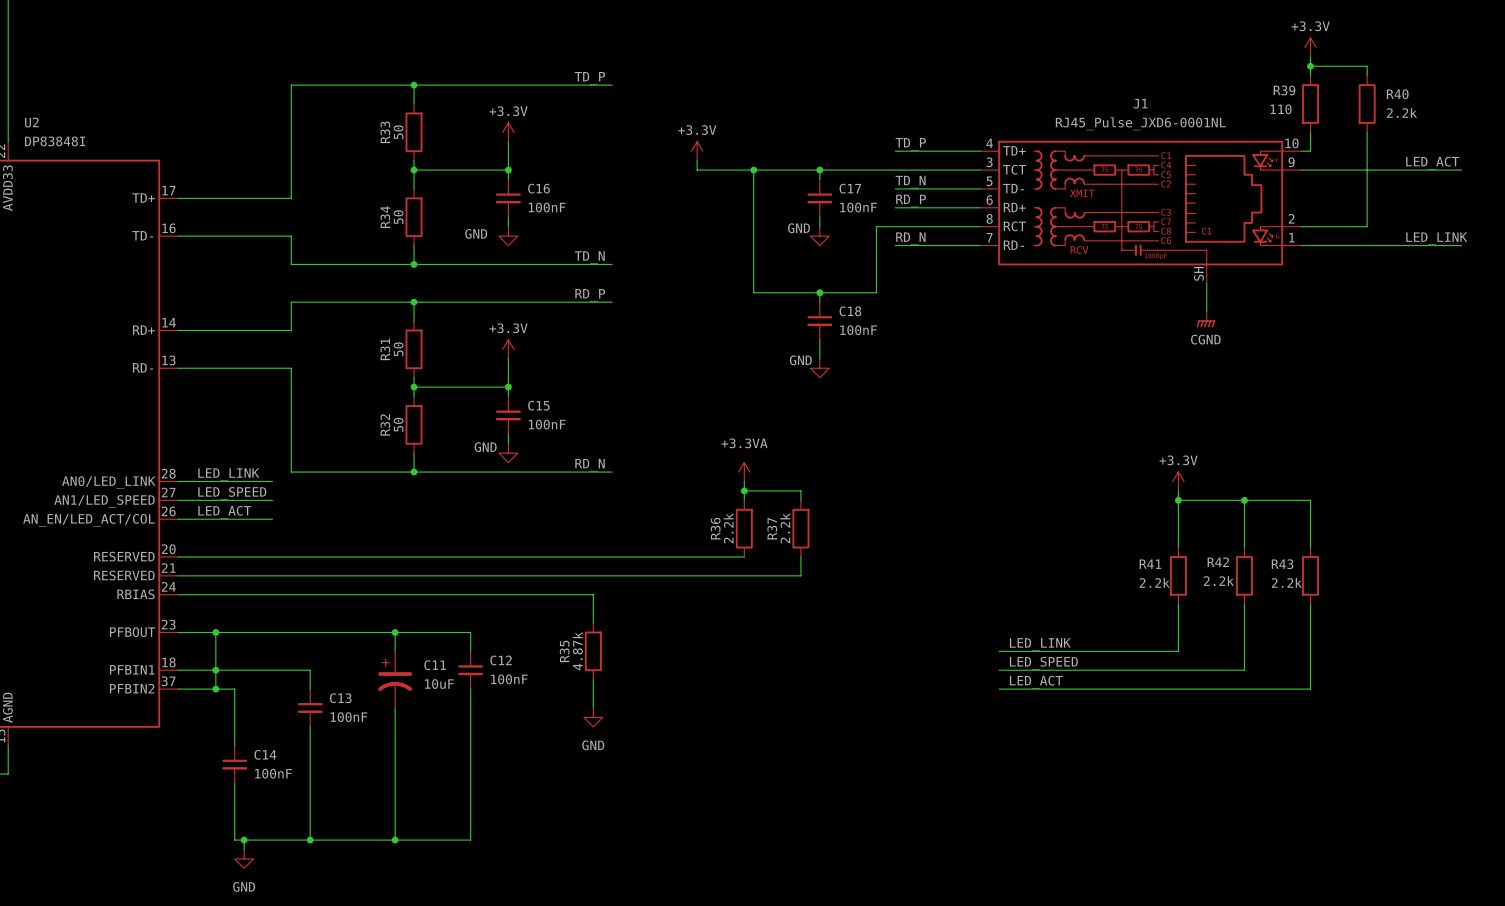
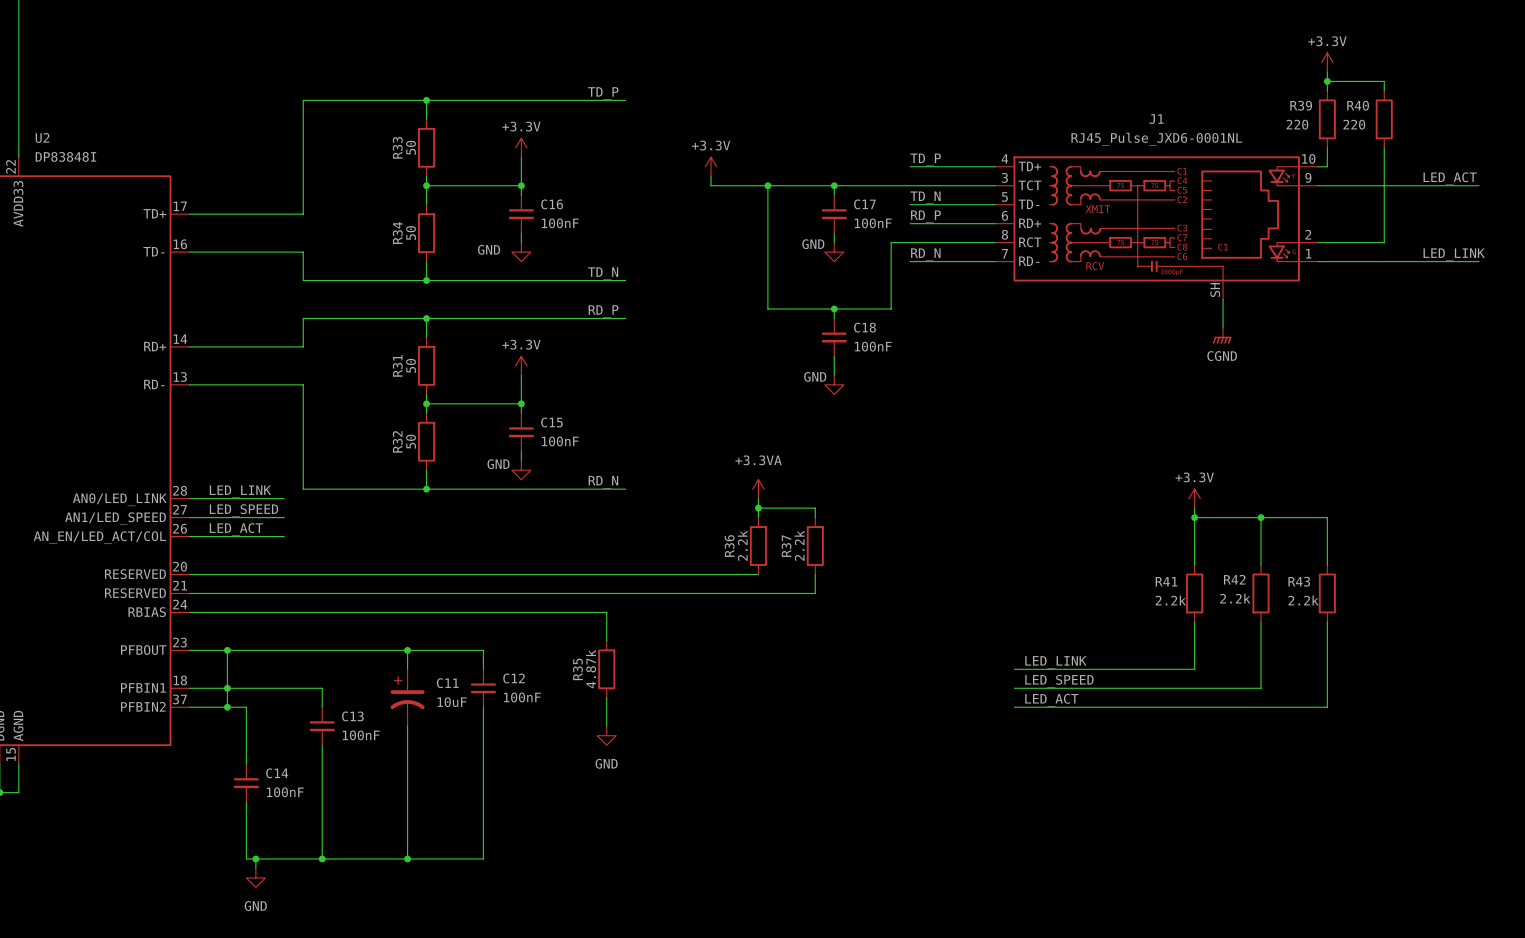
R40 name position: R40 (1397, 94) -> R40 (1358, 105)
R39 value: 110 (1281, 109) -> 220 (1297, 124)
R40 value: 2.2k (1401, 112) -> 220 (1354, 124)

